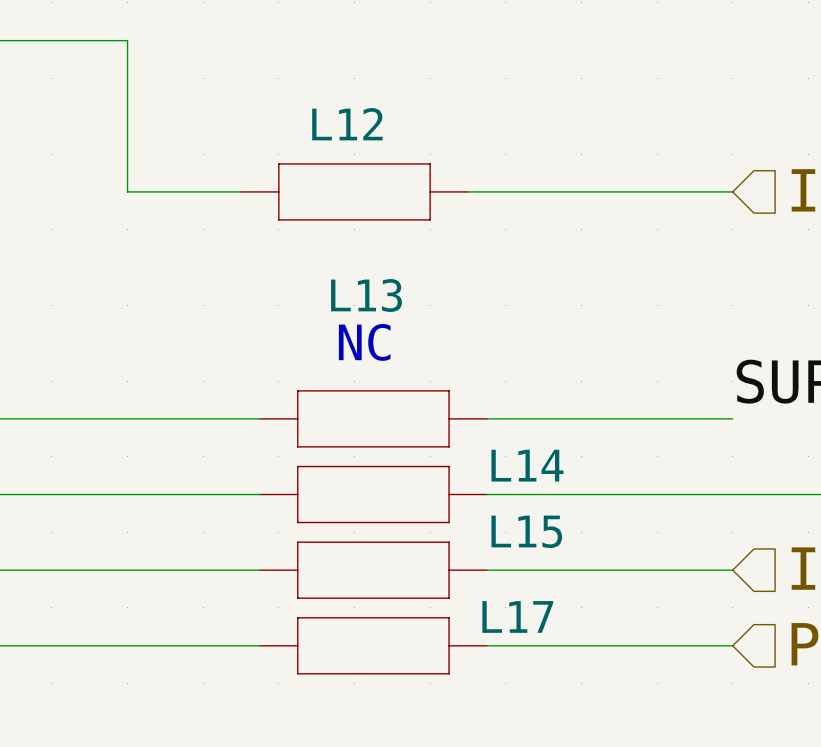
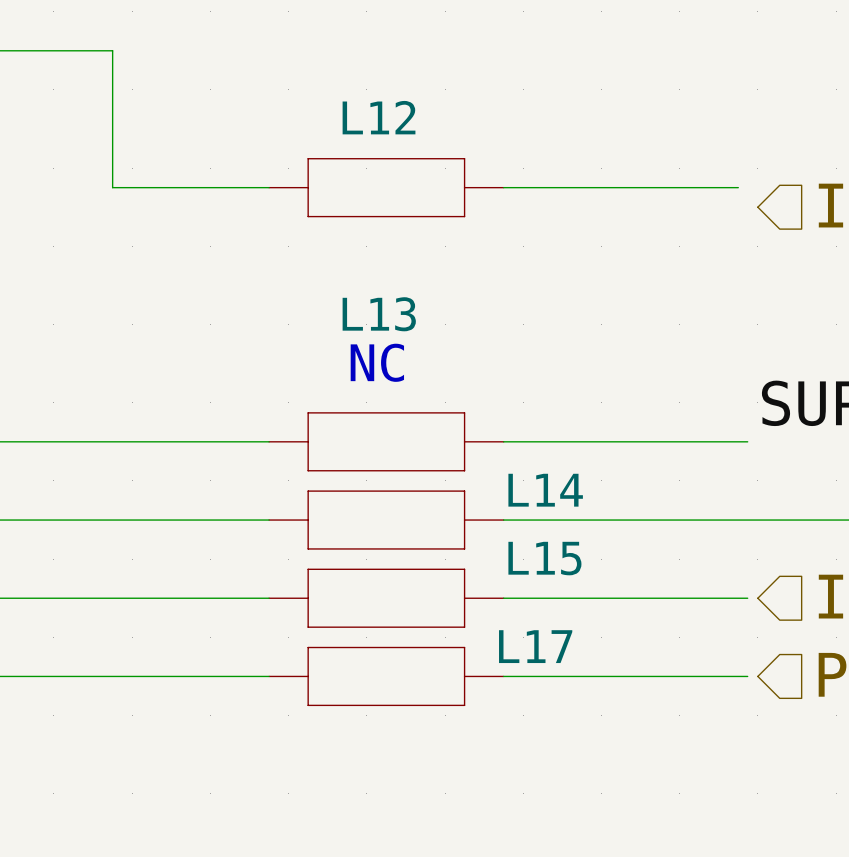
wire: (108, 40) (127, 40) (127, 191) (241, 191) -> (112, 50) (112, 187) (269, 187)
wire: none -> (503, 187) (738, 187)
L12 position: (354, 191) -> (386, 187)
wire: (467, 191) (732, 191) -> none
wire: (722, 418) (732, 418) -> none
wire: (722, 570) (732, 570) -> none
wire: (722, 645) (732, 645) -> none

